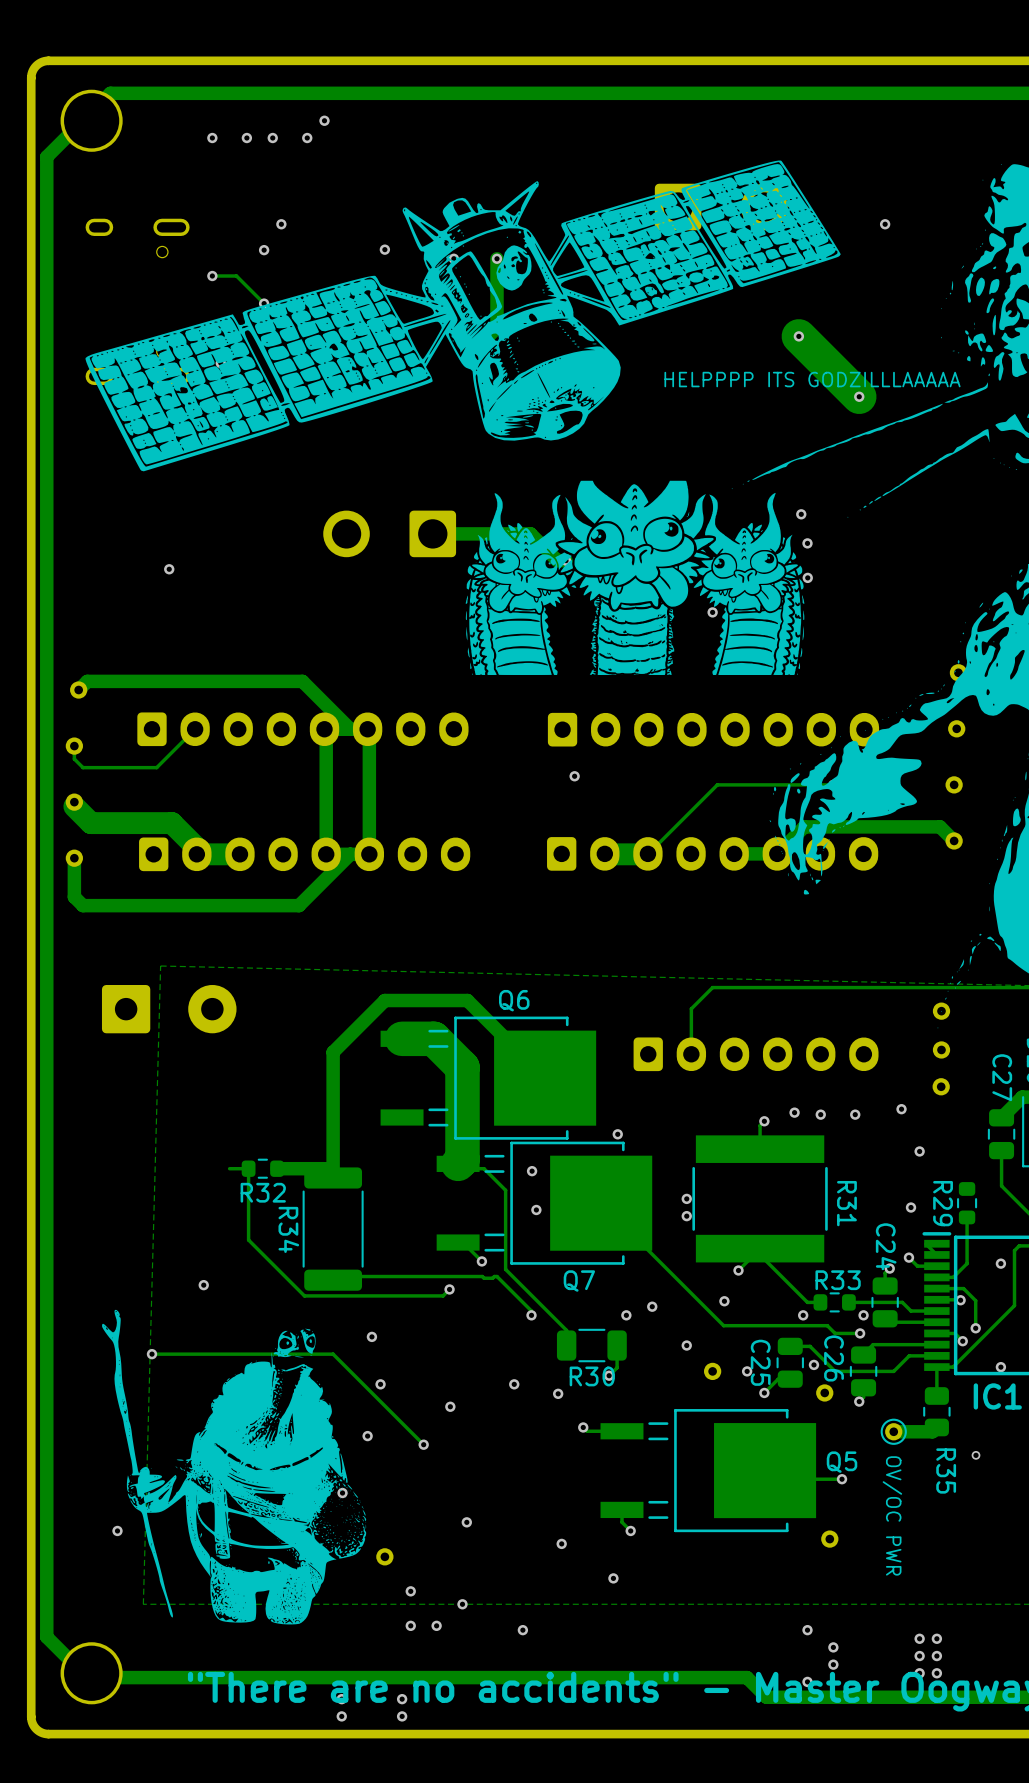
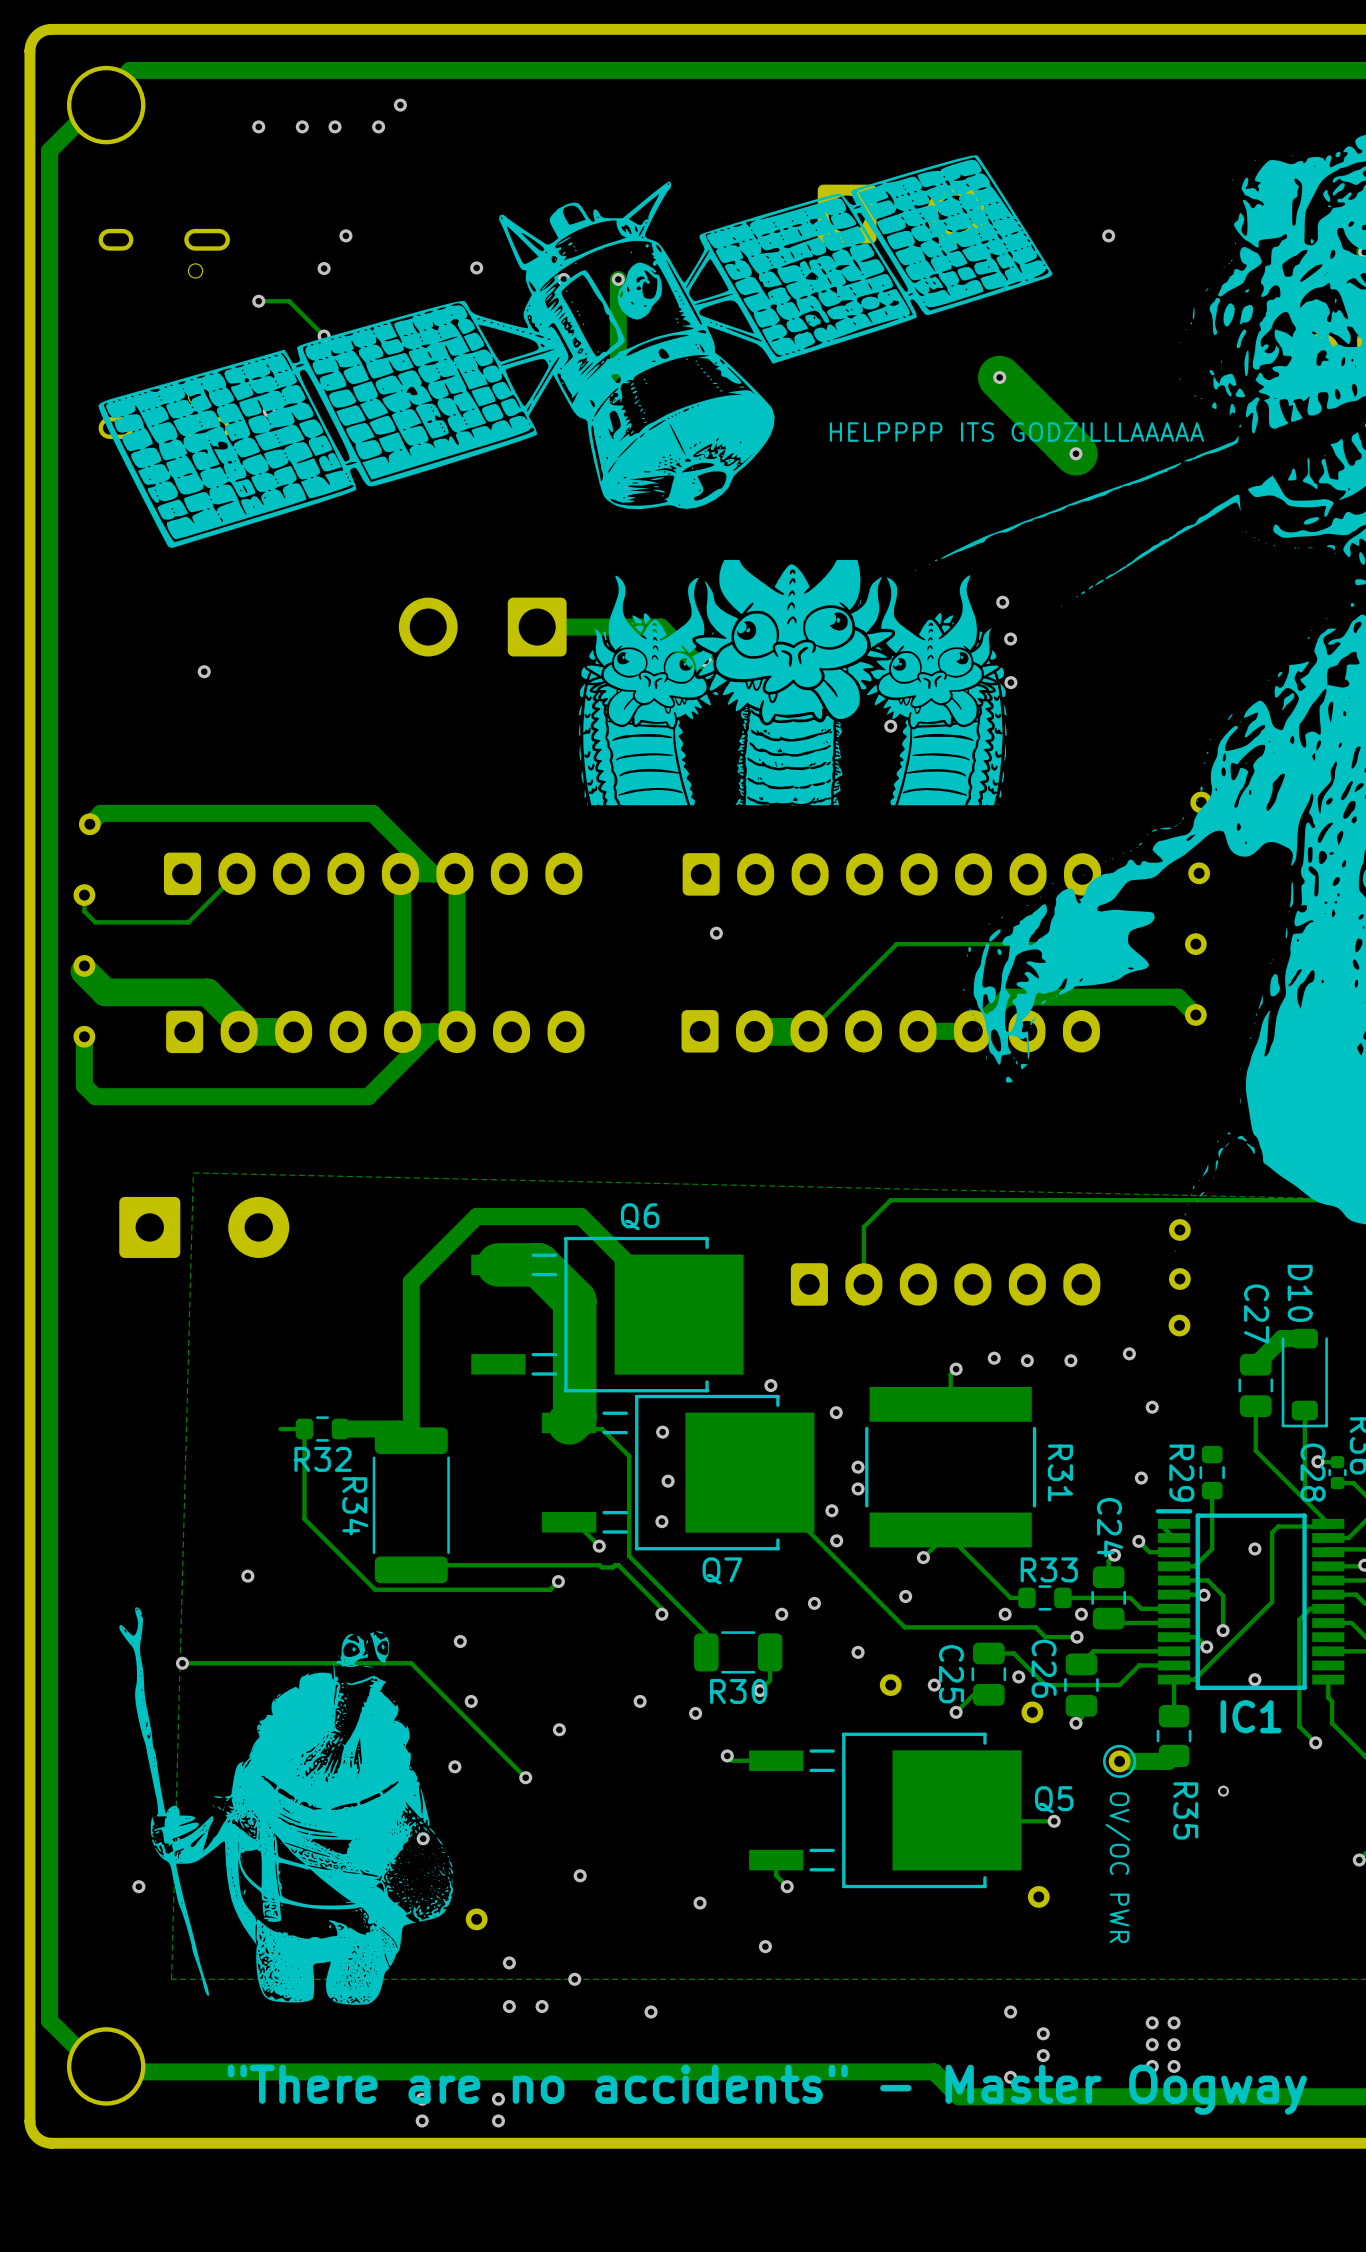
via: none -> (836, 1412)
via: none -> (831, 1510)
via: none -> (661, 1521)
via: none -> (836, 1540)

